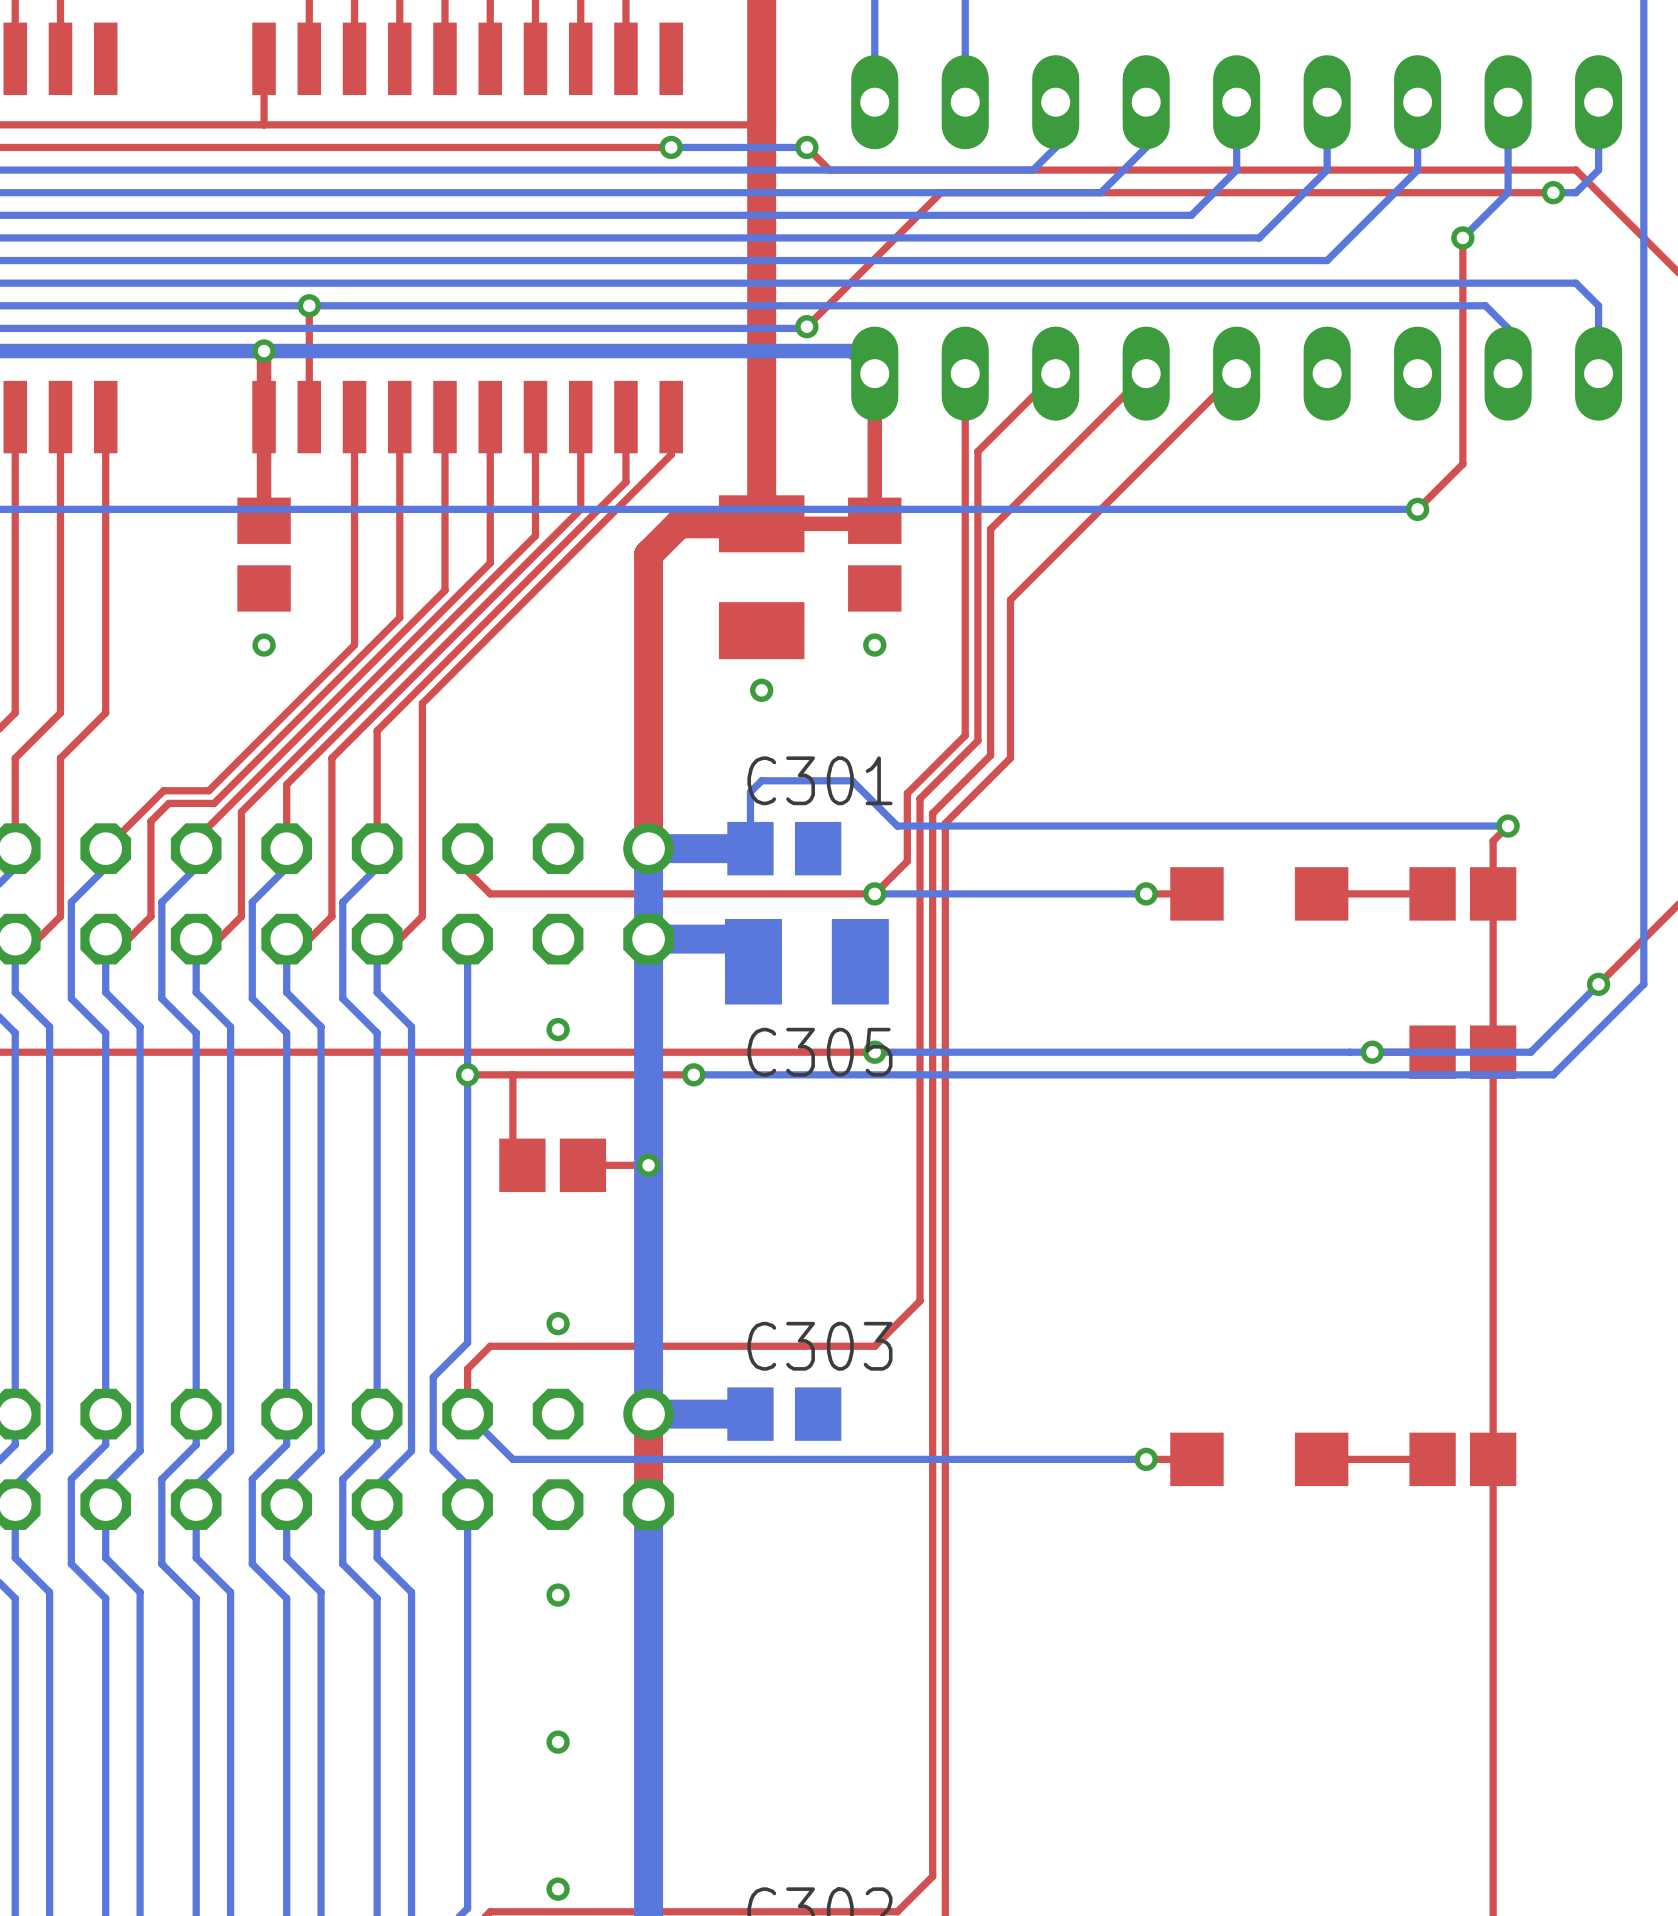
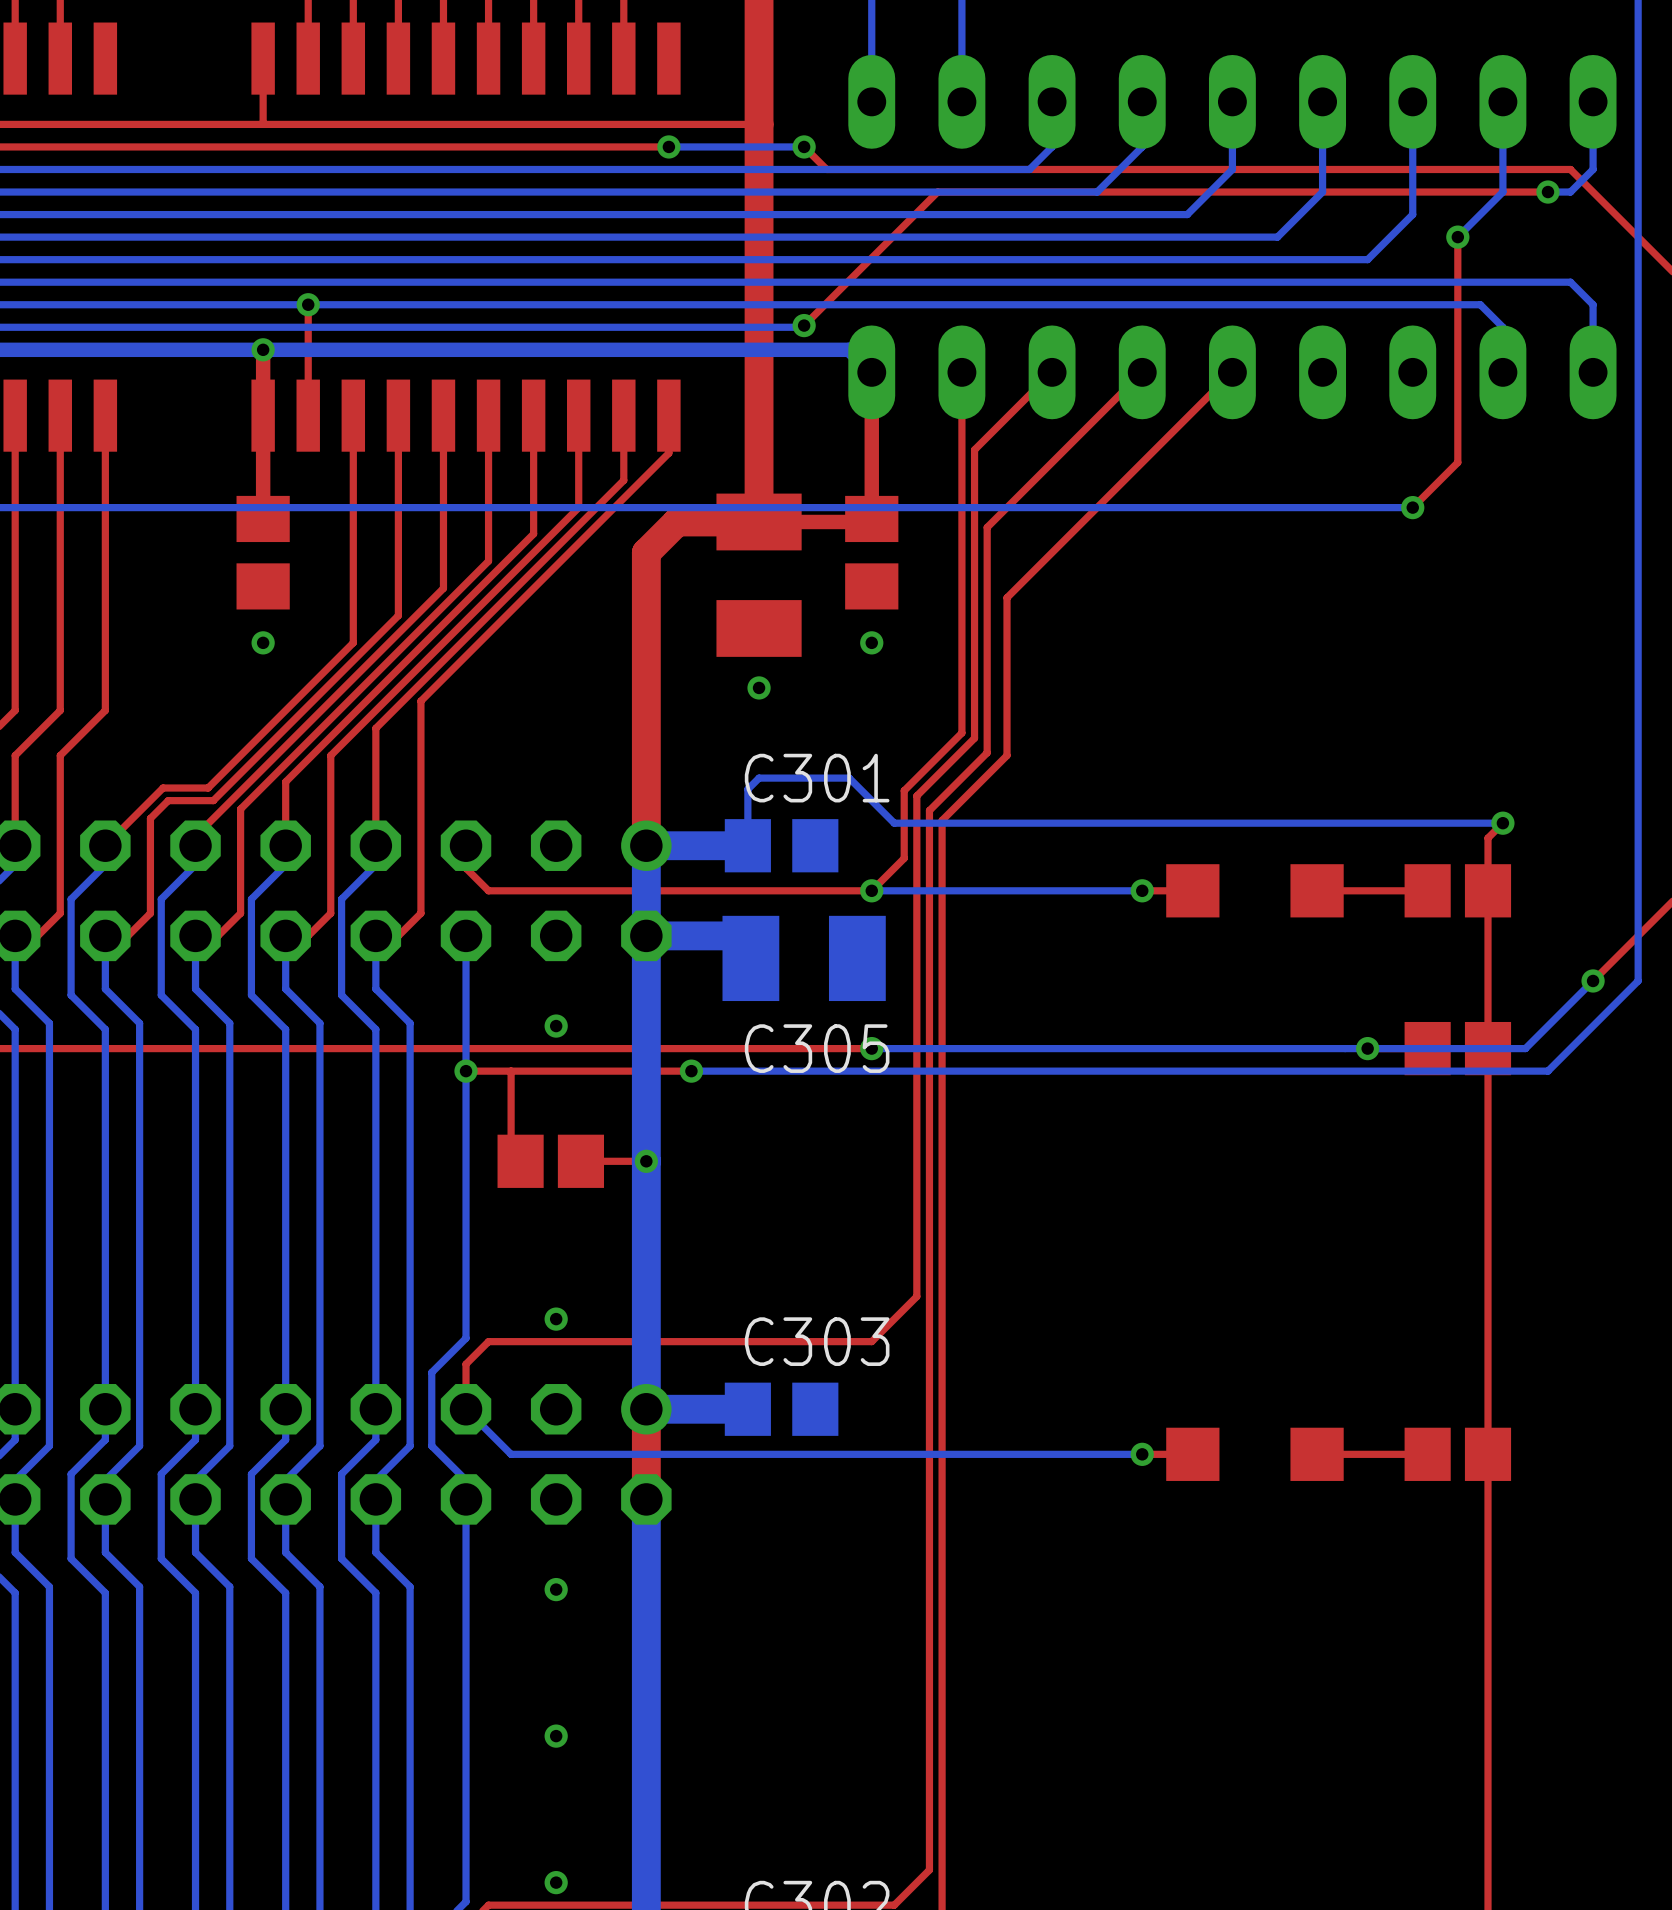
bottom track: (1327, 170) (1259, 237) -> (1322, 169) (1322, 192) (1277, 237) (1254, 237)
bottom track: (1417, 170) (1327, 260) -> (1412, 169) (1412, 214) (1367, 259) (1322, 259)

